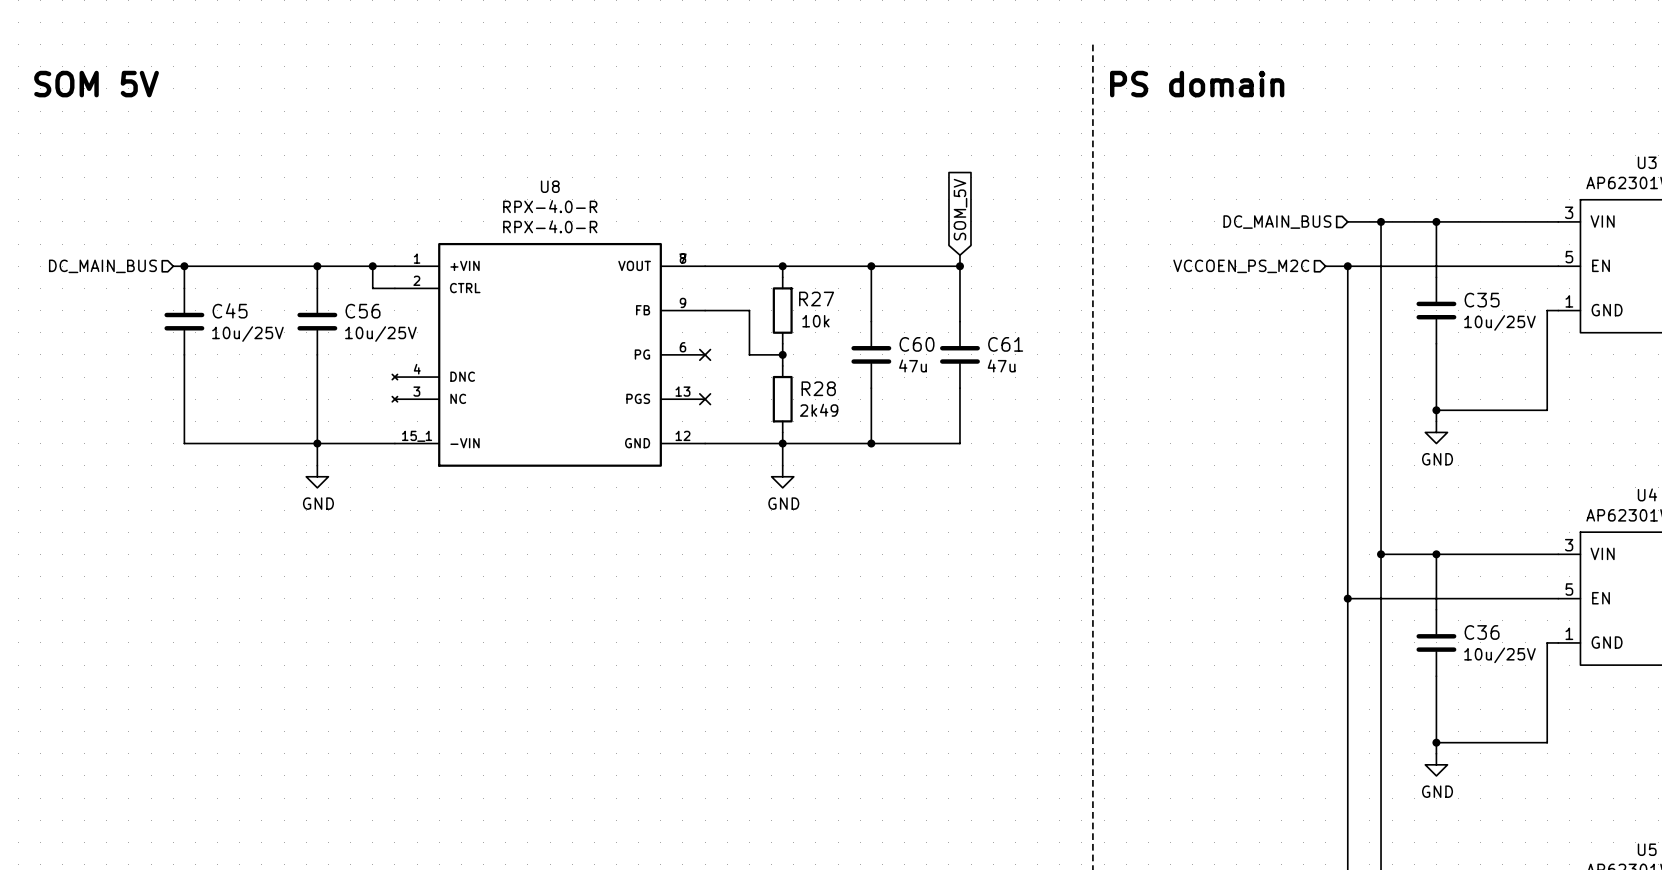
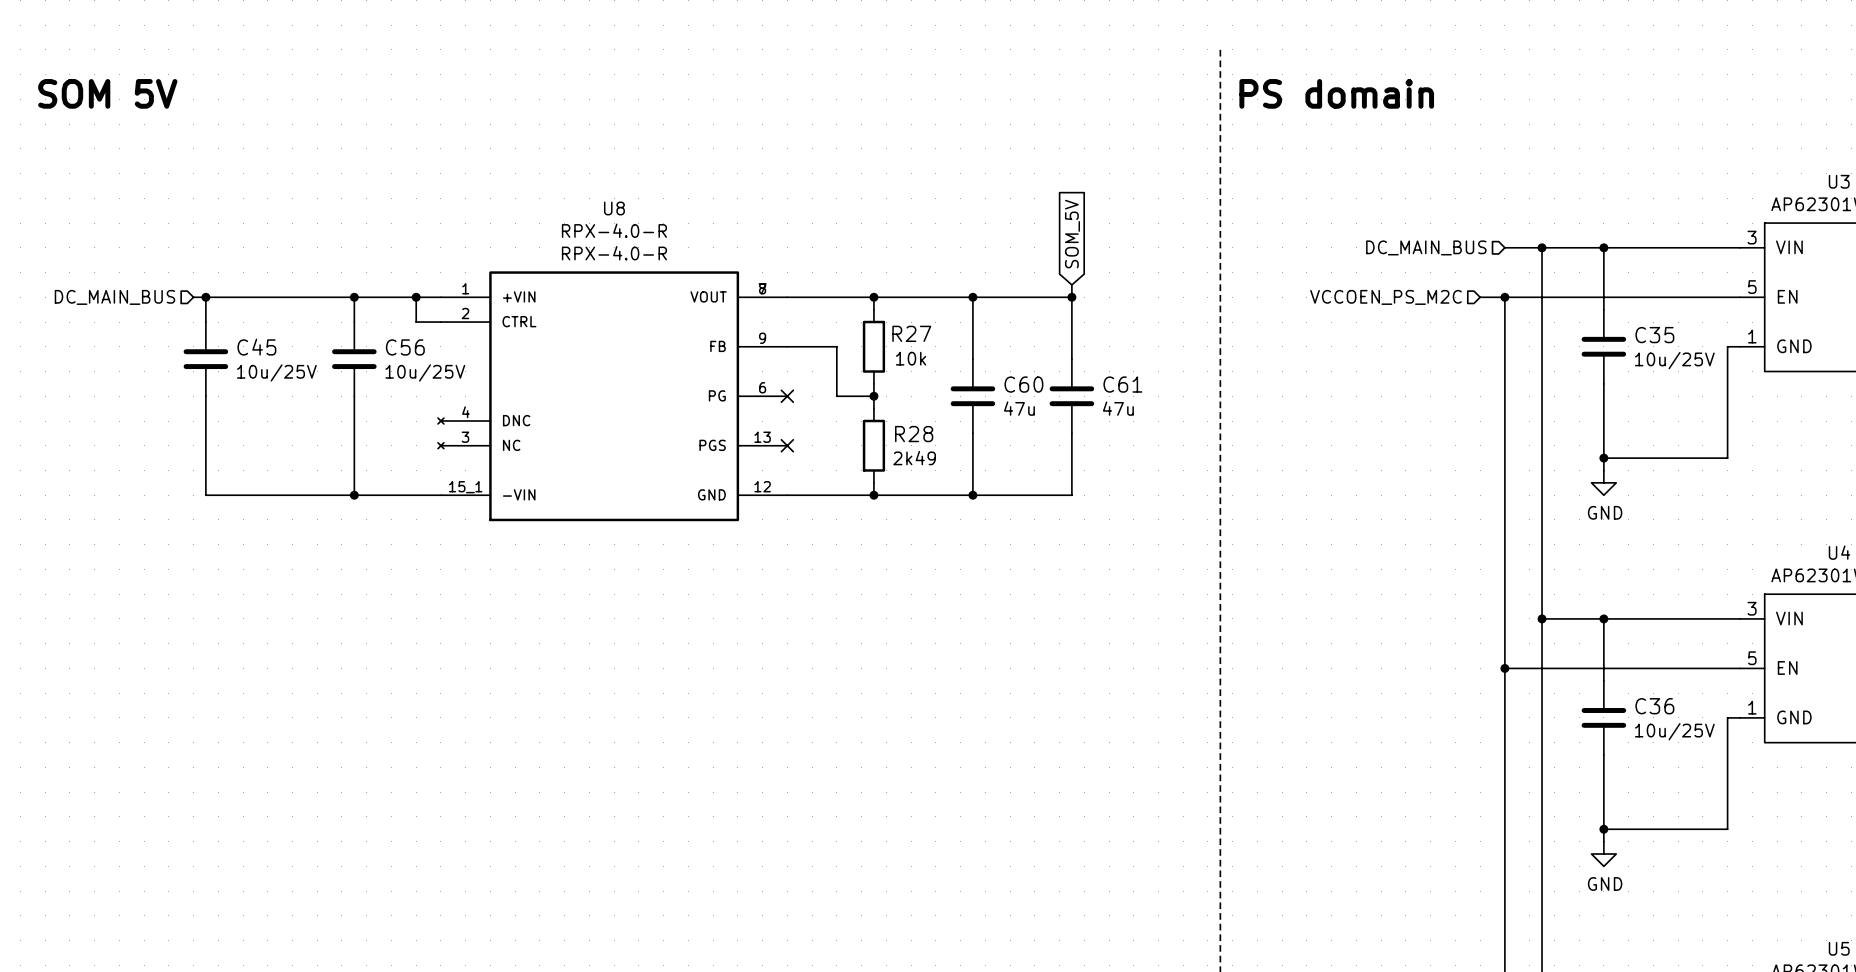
wire: (317, 443) (317, 465) -> none
wire: (782, 443) (782, 465) -> none
power symbol: GND (317, 476) -> none
power symbol: GND (782, 476) -> none

